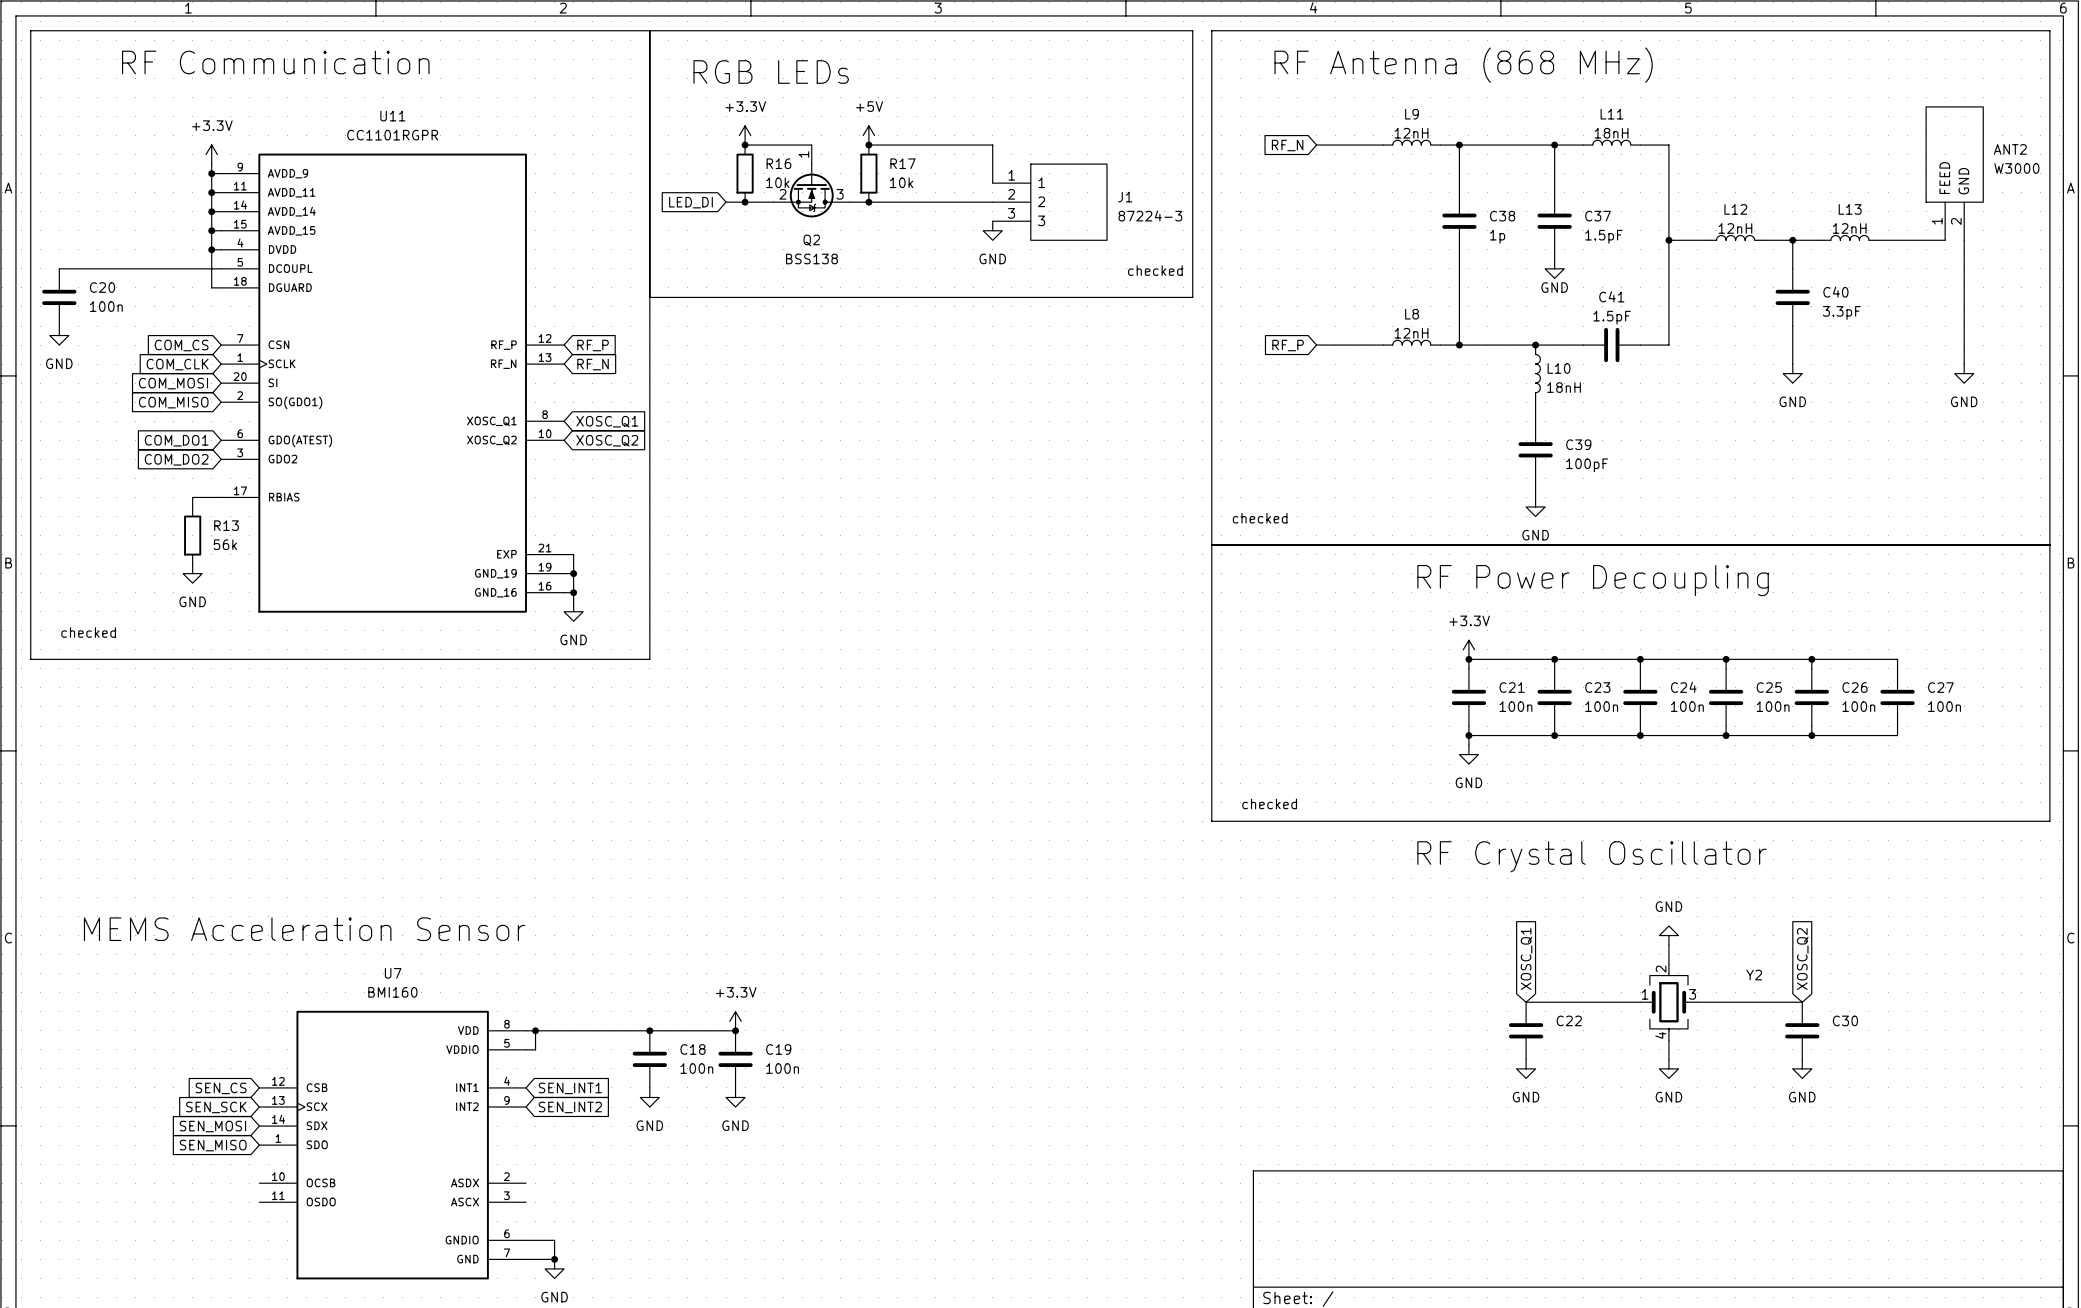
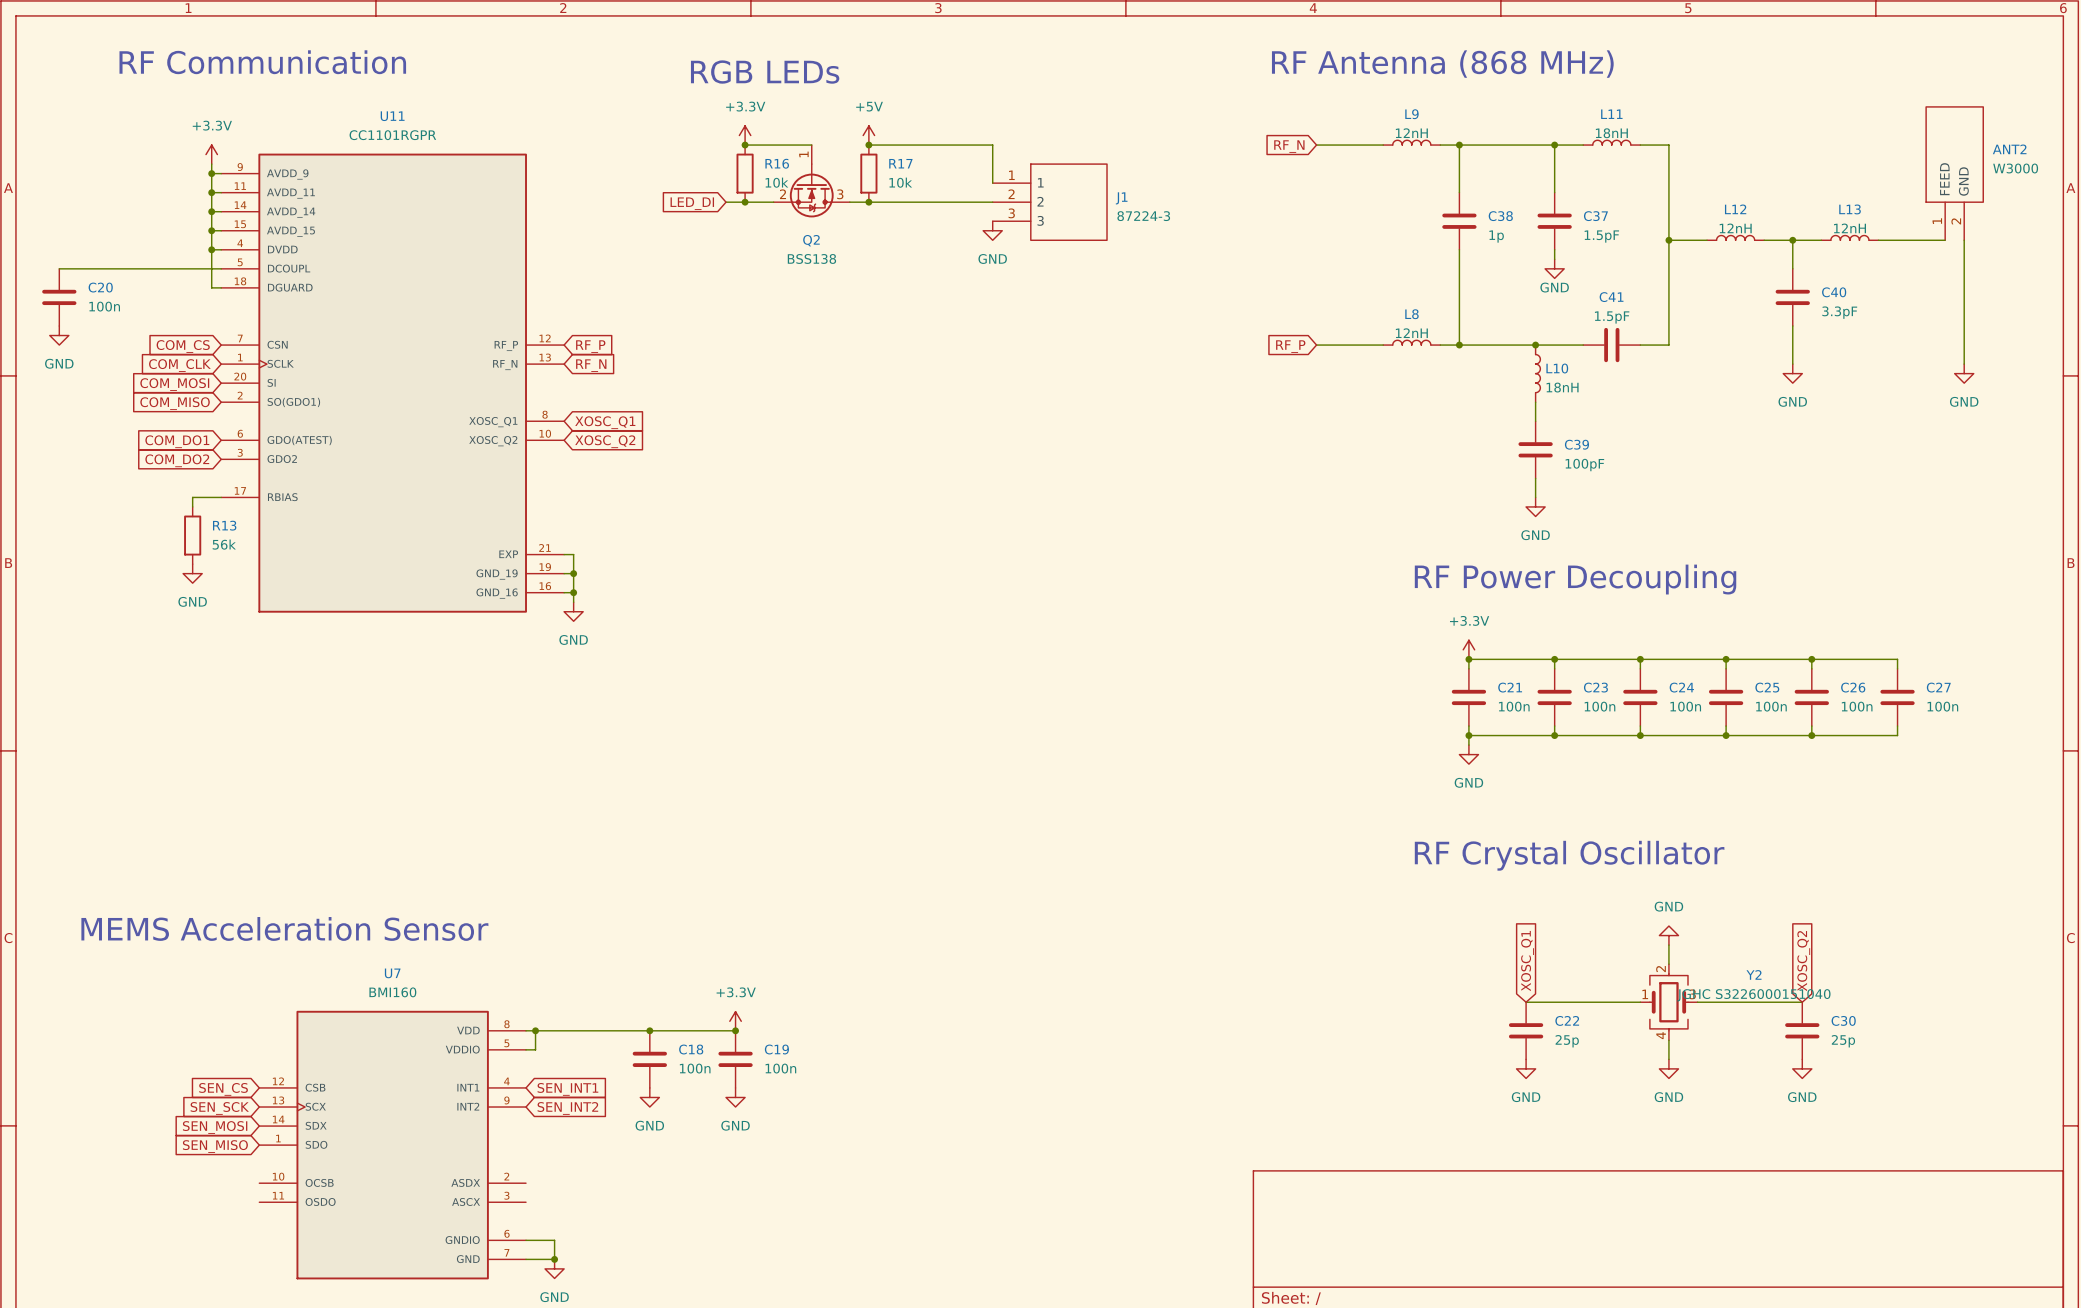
line: (649, 30) (649, 659) (30, 659) (30, 30) (1192, 30) (1192, 297) (649, 297) -> none
line: (1211, 30) (2049, 30) (2049, 821) (1211, 821) (1211, 30) -> none
text: checked (1155, 270) -> none
text: checked (1260, 518) -> none
line: (1211, 545) (2049, 545) -> none
text: checked (88, 632) -> none
text: checked (1269, 803) -> none
Y2 value: none -> JGHC S3226000151040 (1753, 995)
C22 value: none -> 25p (1567, 1041)
C30 value: none -> 25p (1843, 1041)

